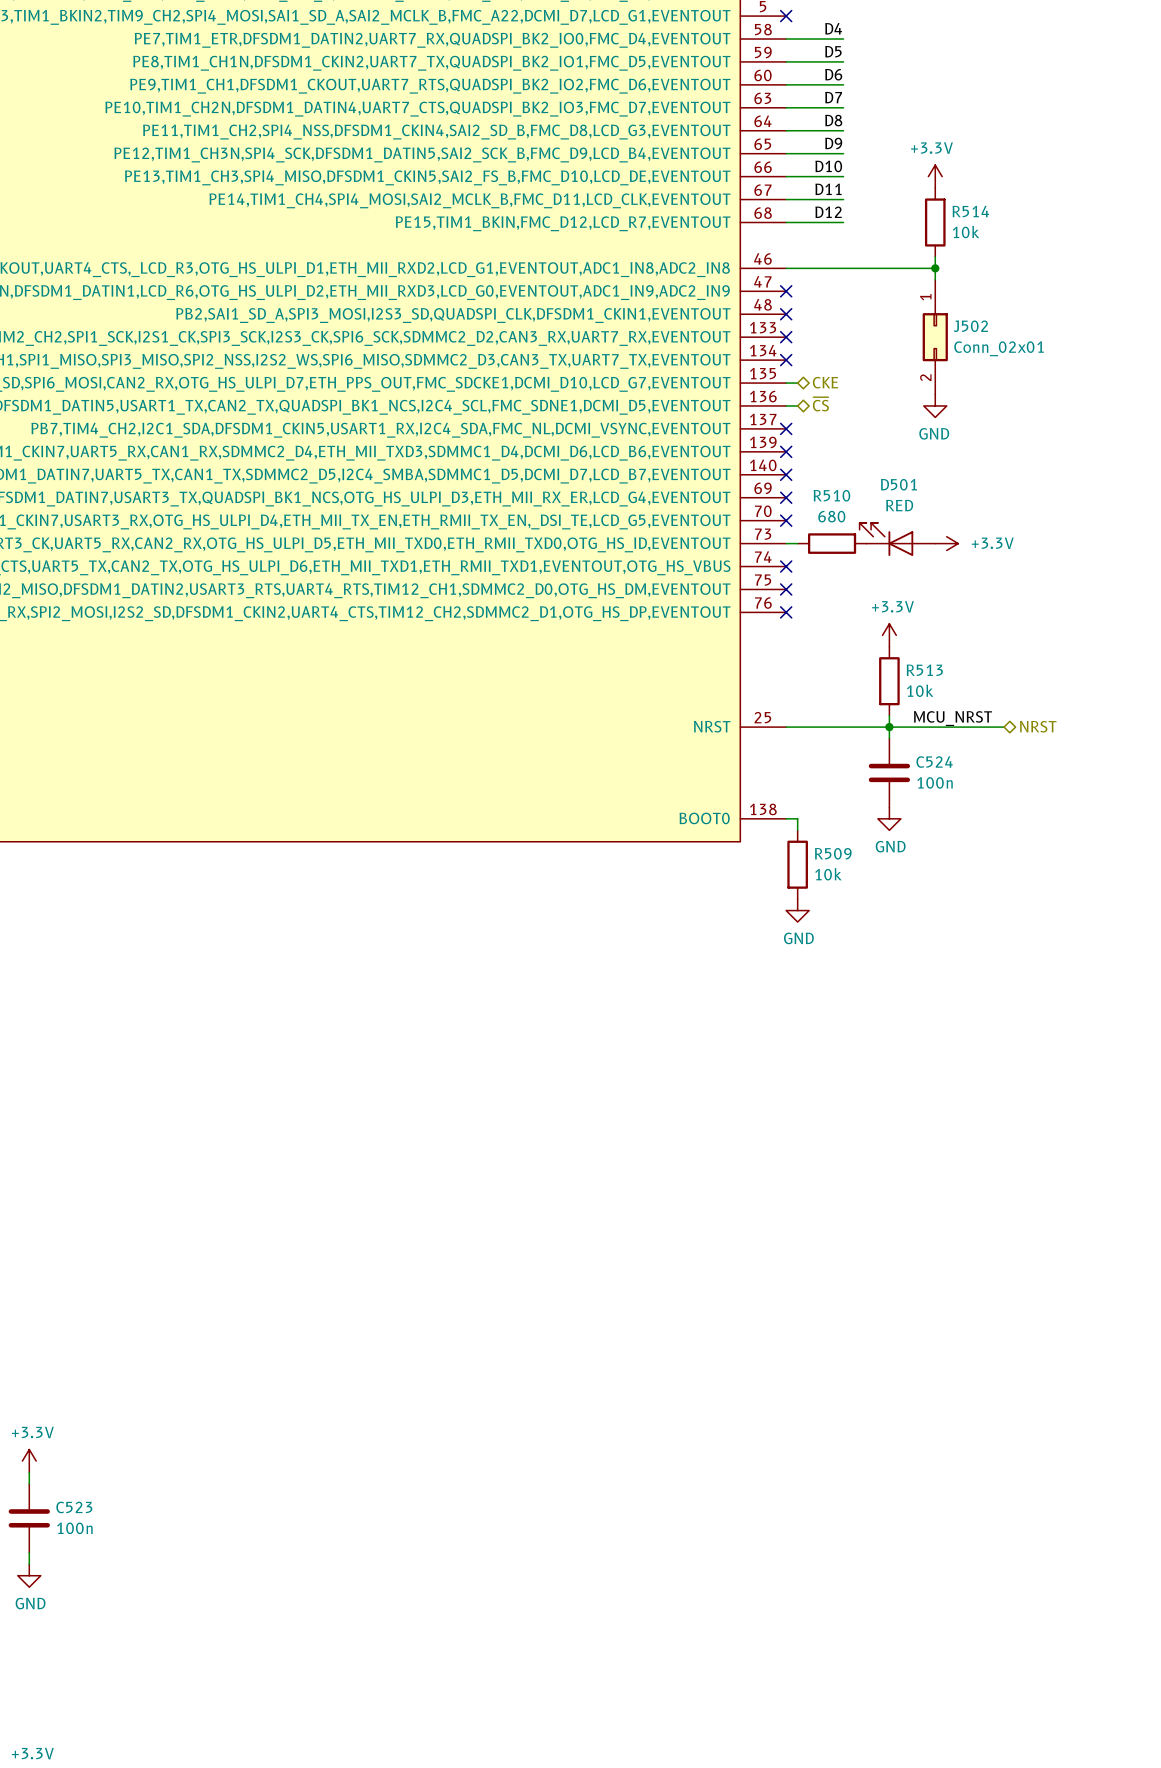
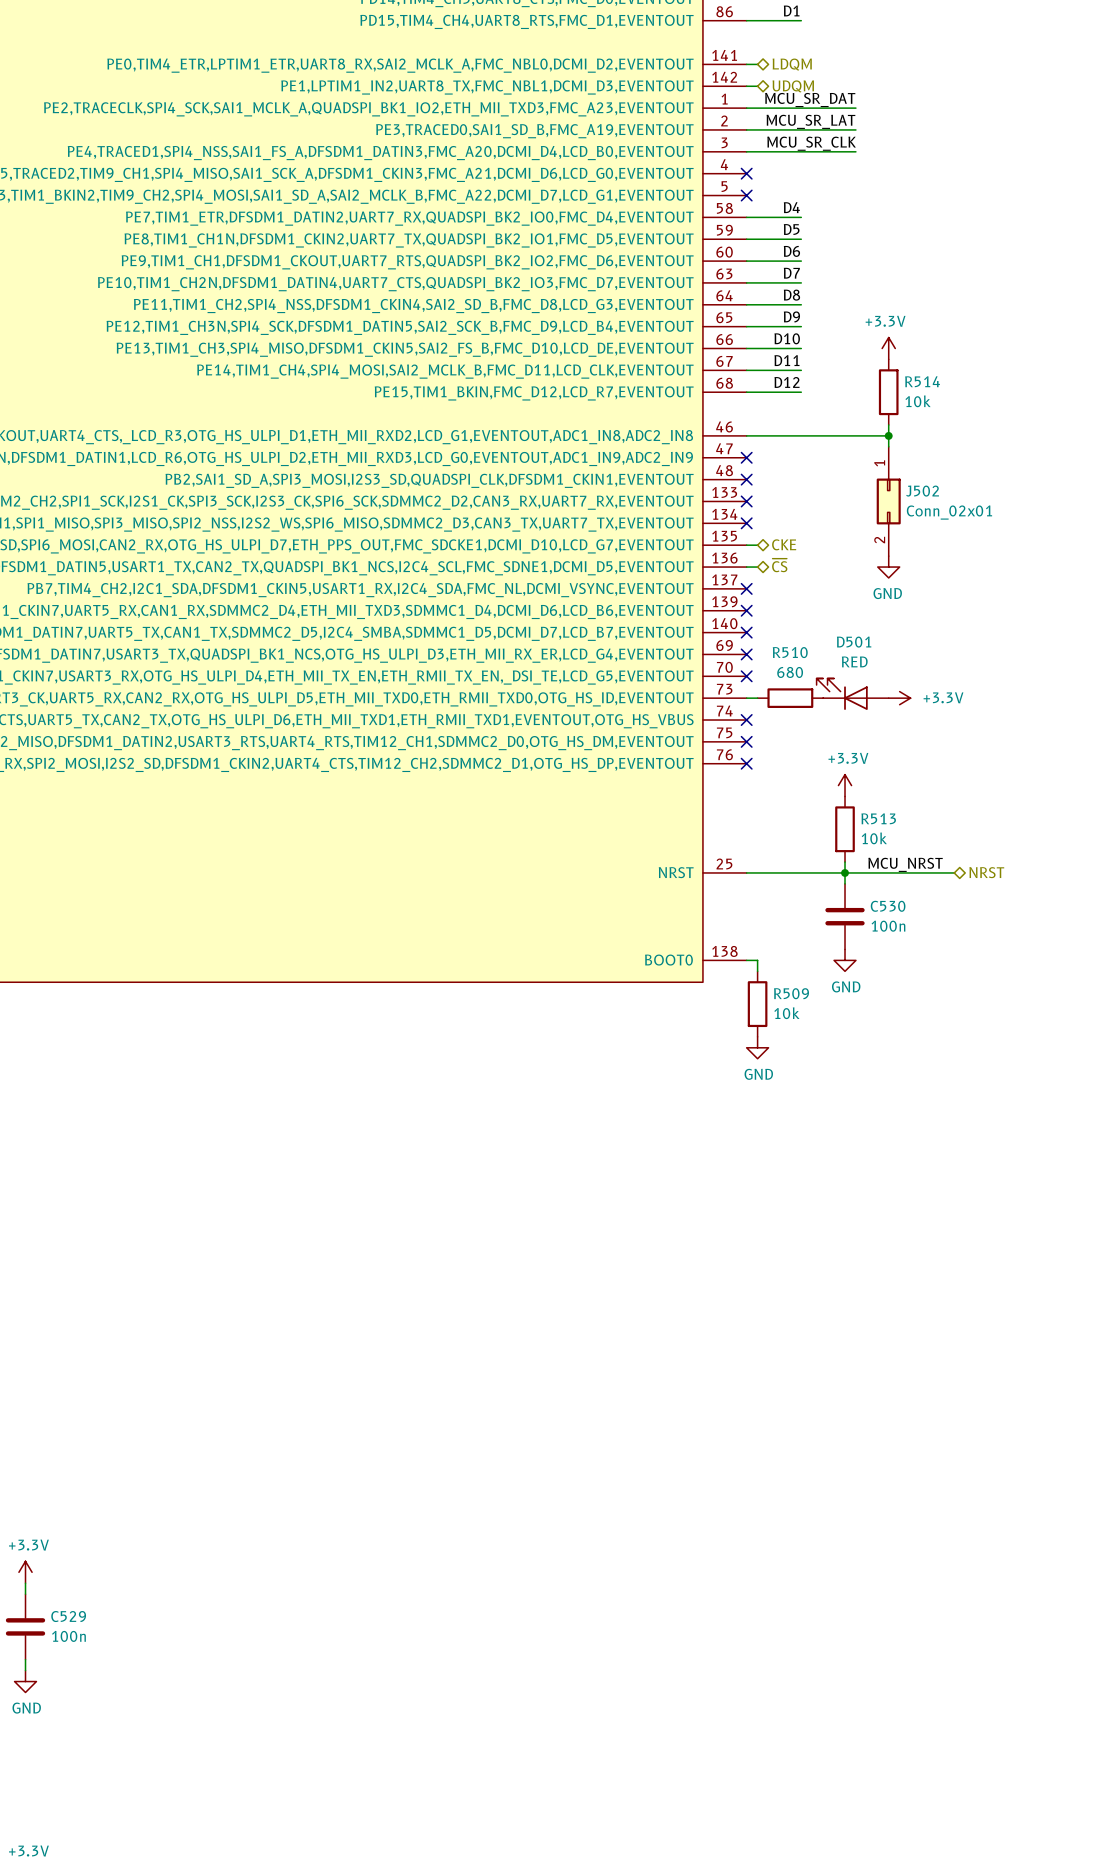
C524 name: C524 (934, 762) -> C530 (888, 906)
C523 name: C523 (74, 1507) -> C529 (68, 1616)

